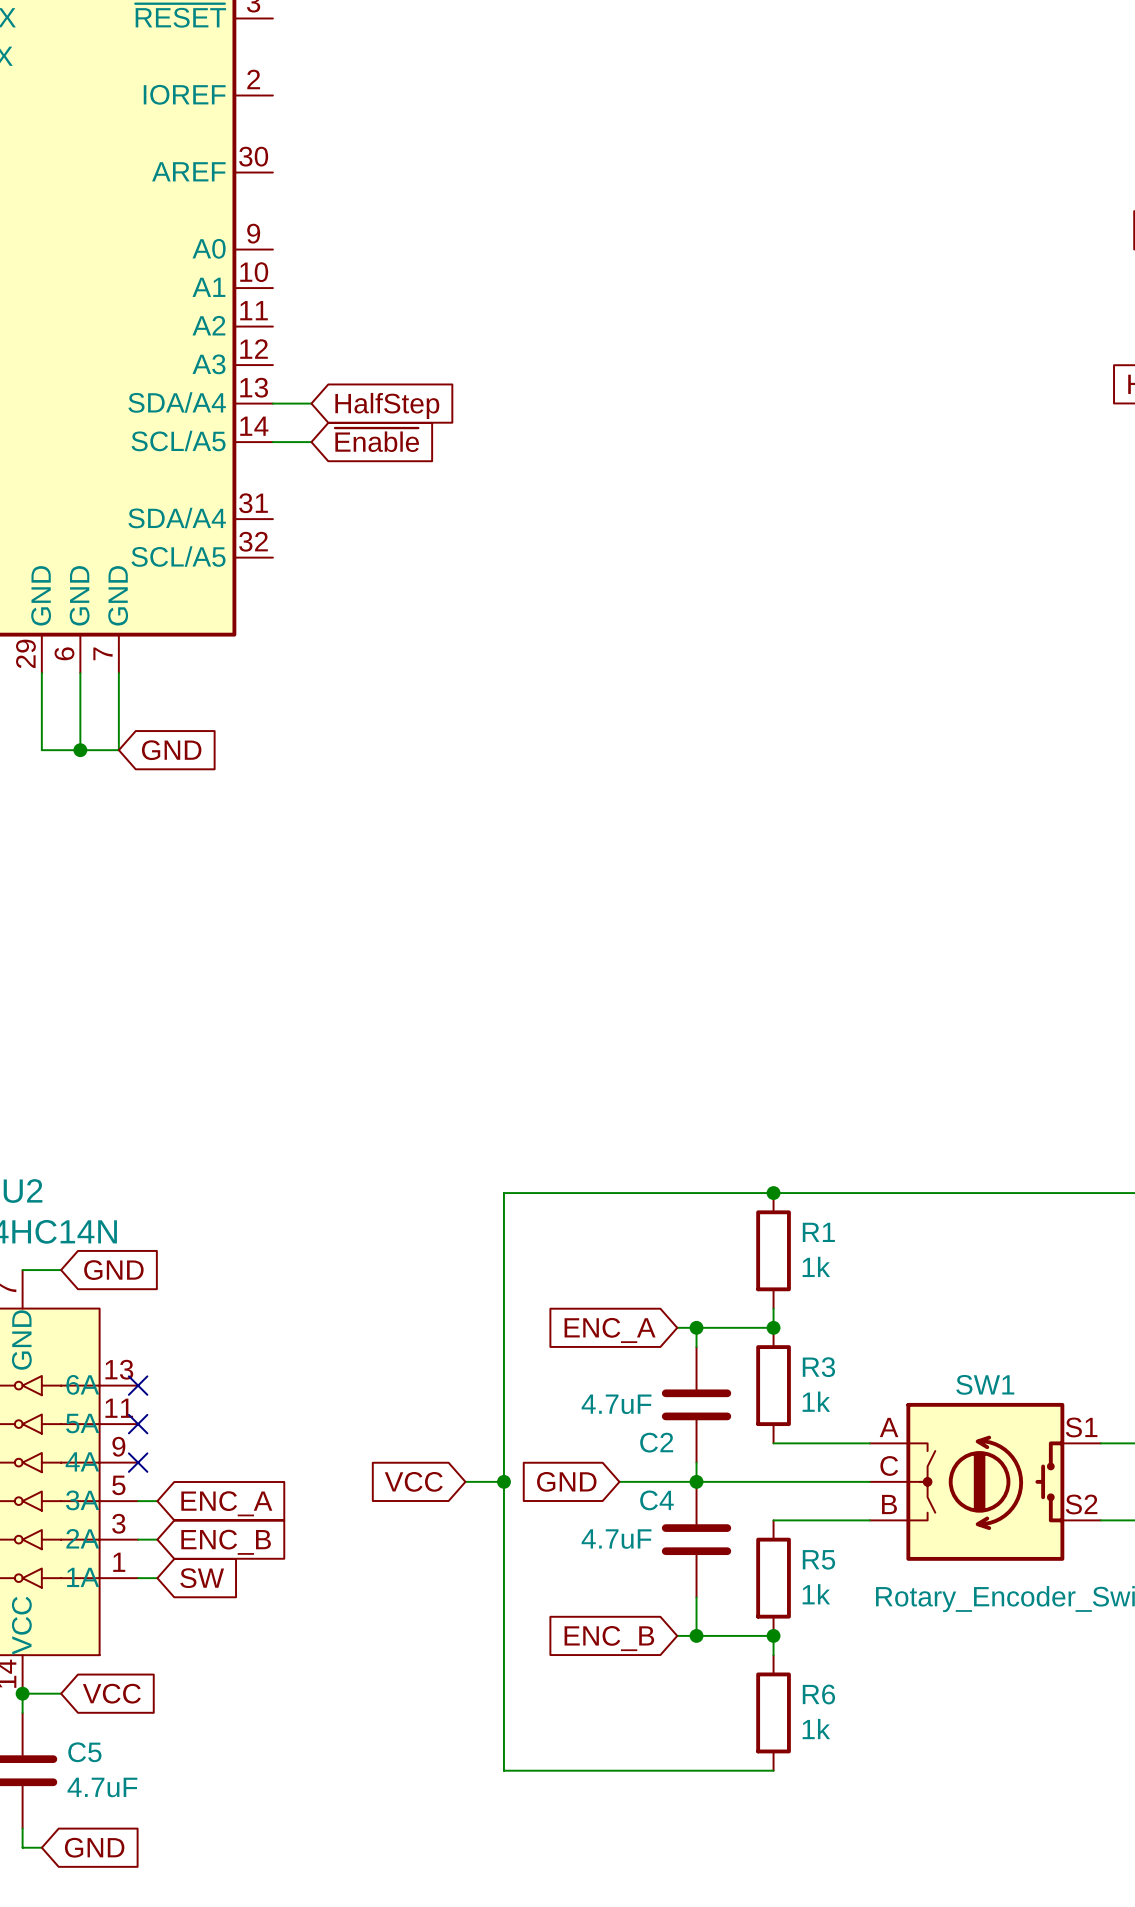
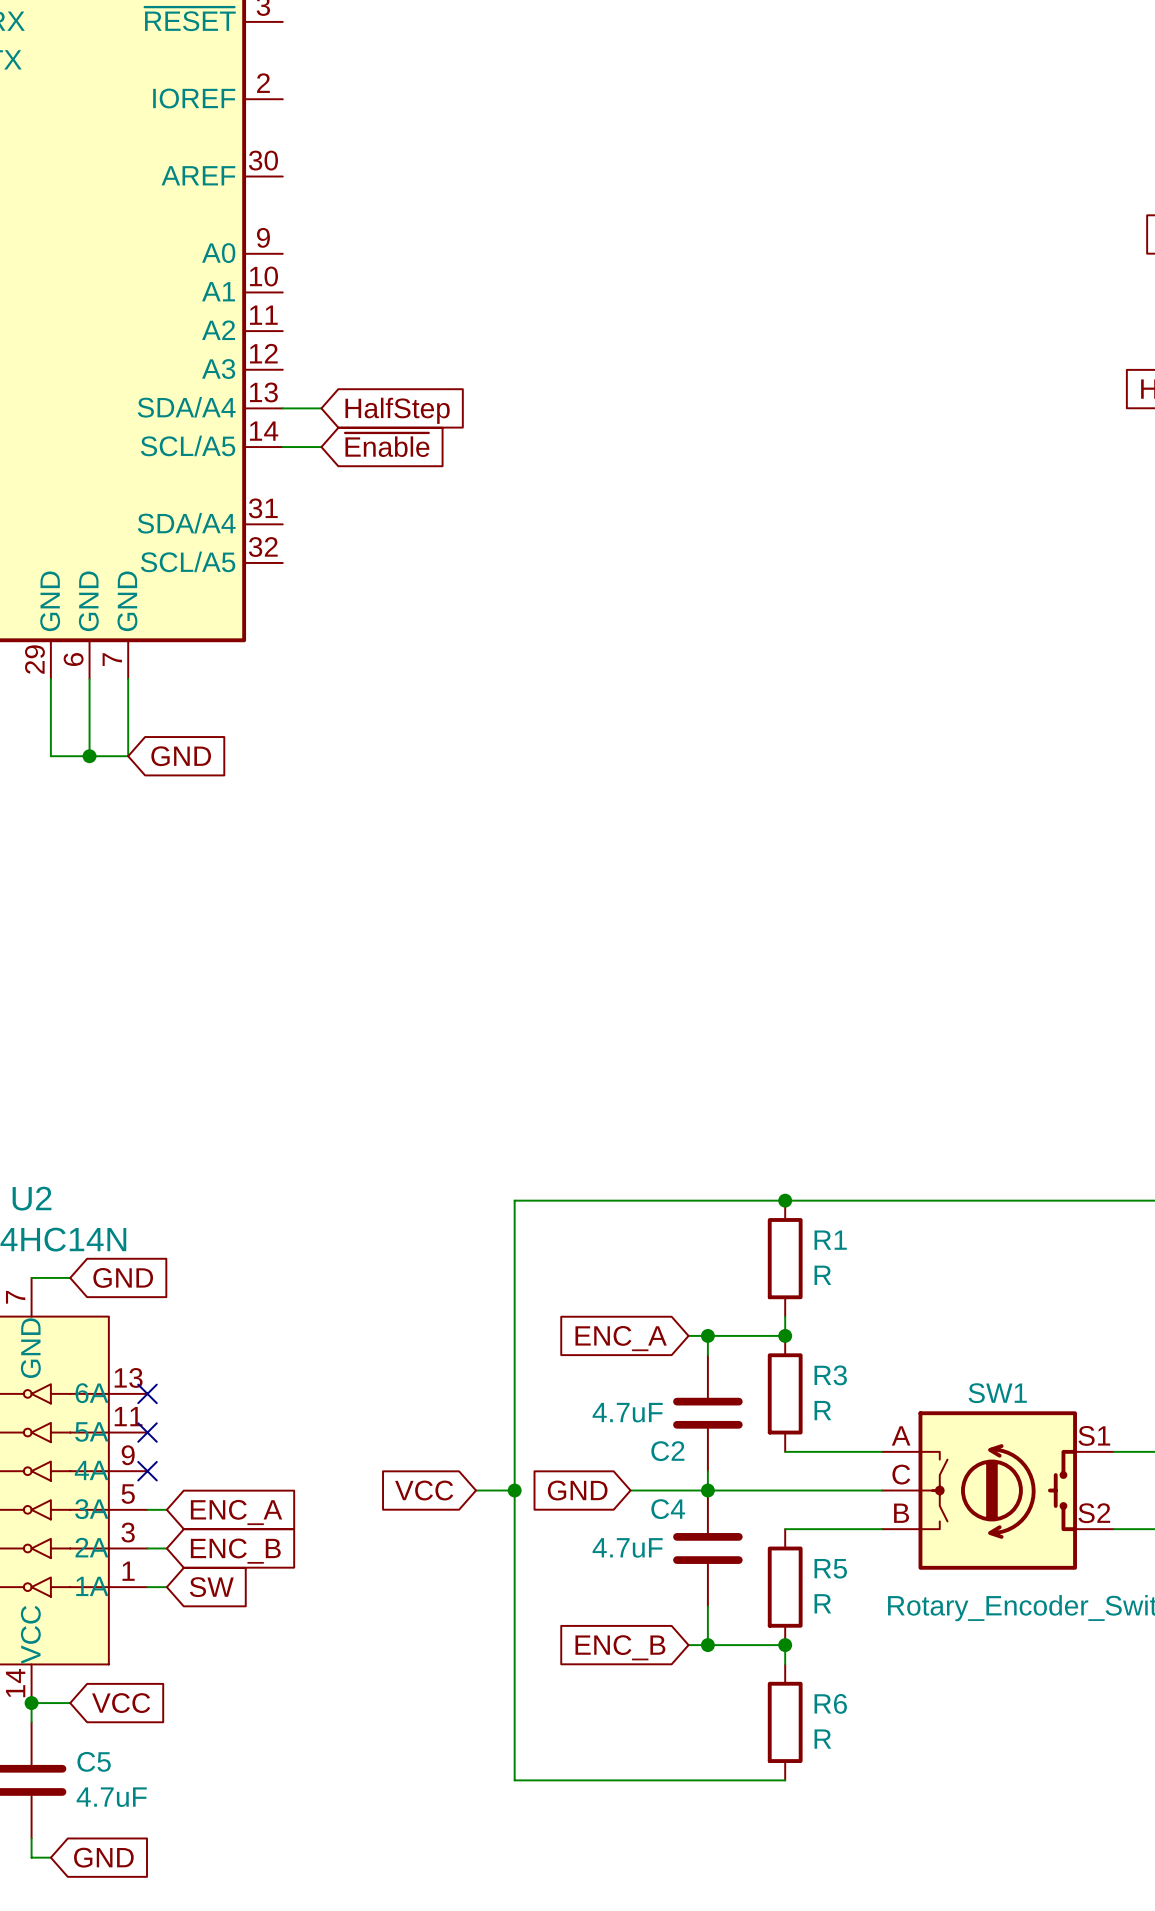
R1 value: 1k (816, 1266) -> R (822, 1275)
R3 value: 1k (816, 1401) -> R (822, 1410)
R5 value: 1k (816, 1594) -> R (822, 1603)
R6 value: 1k (816, 1729) -> R (822, 1739)

